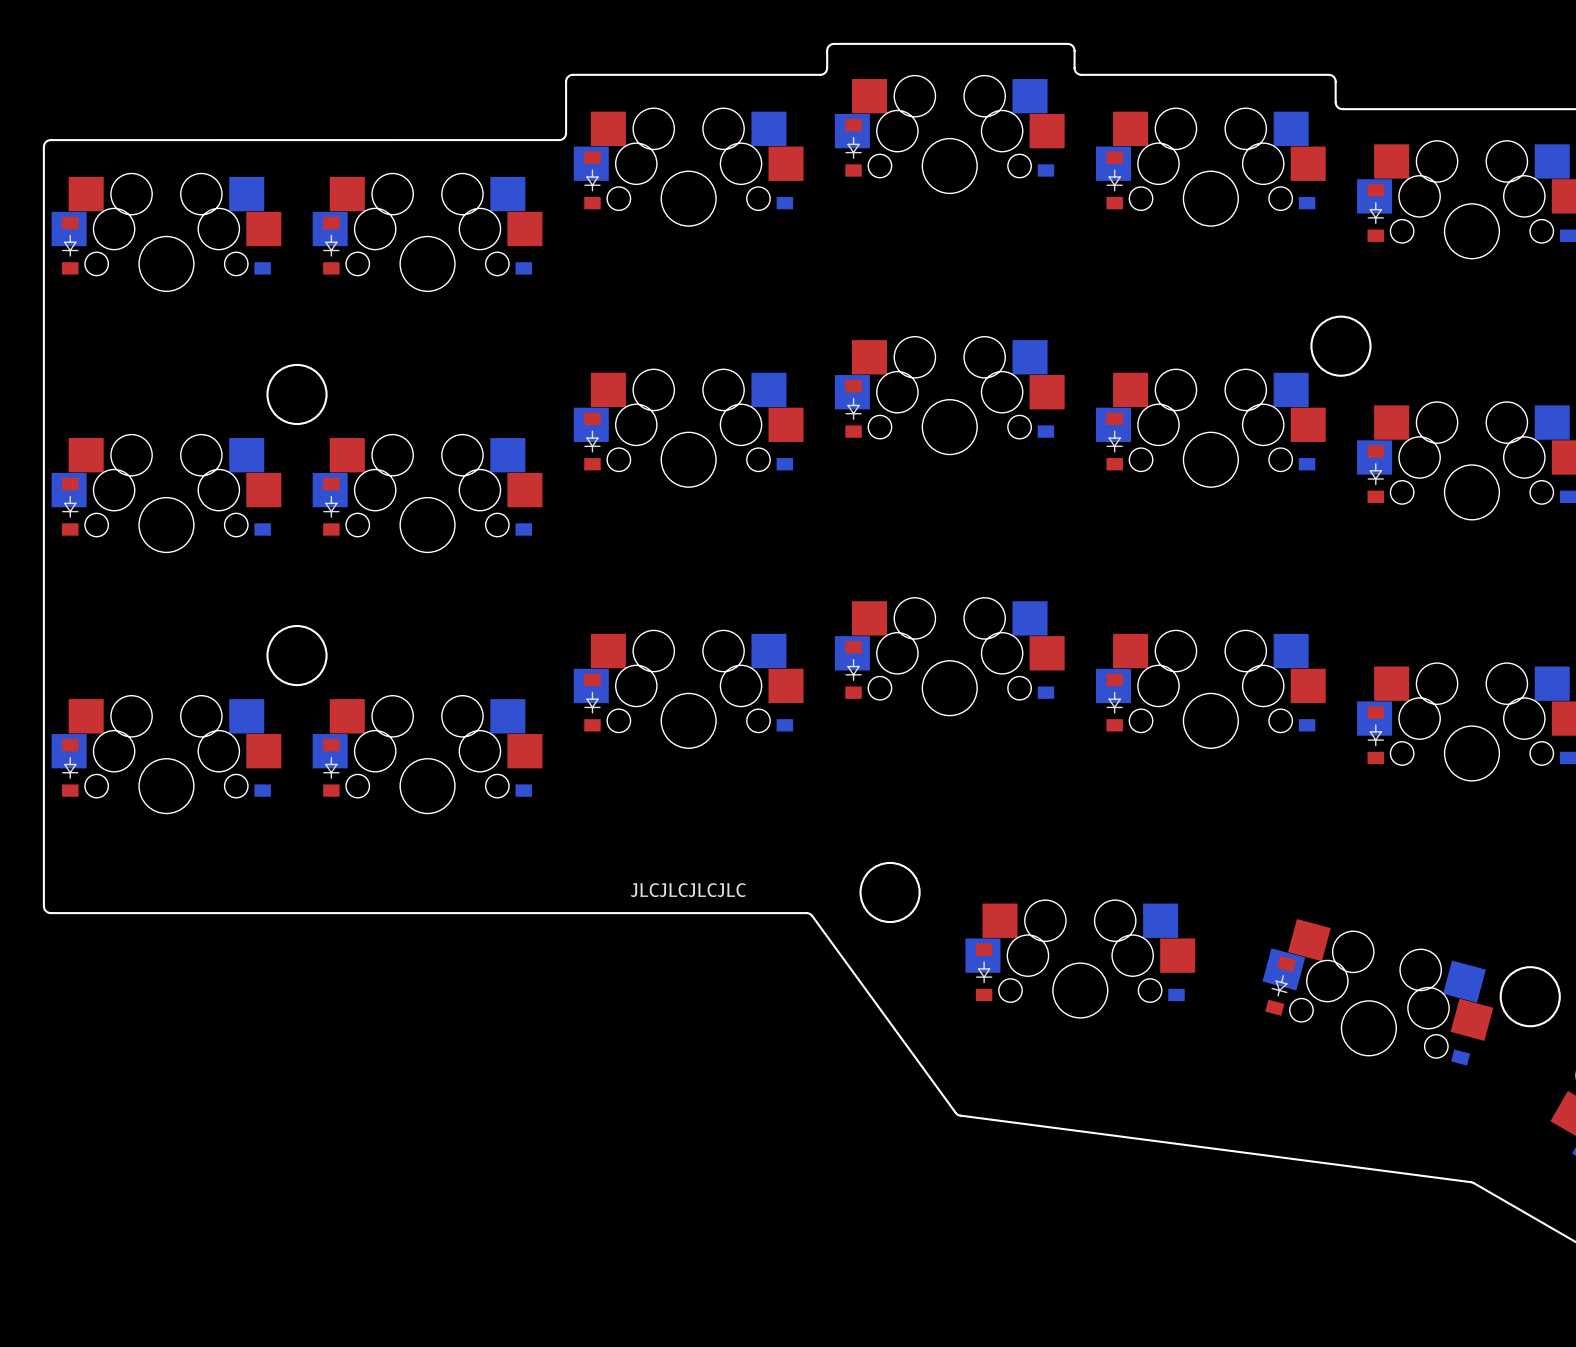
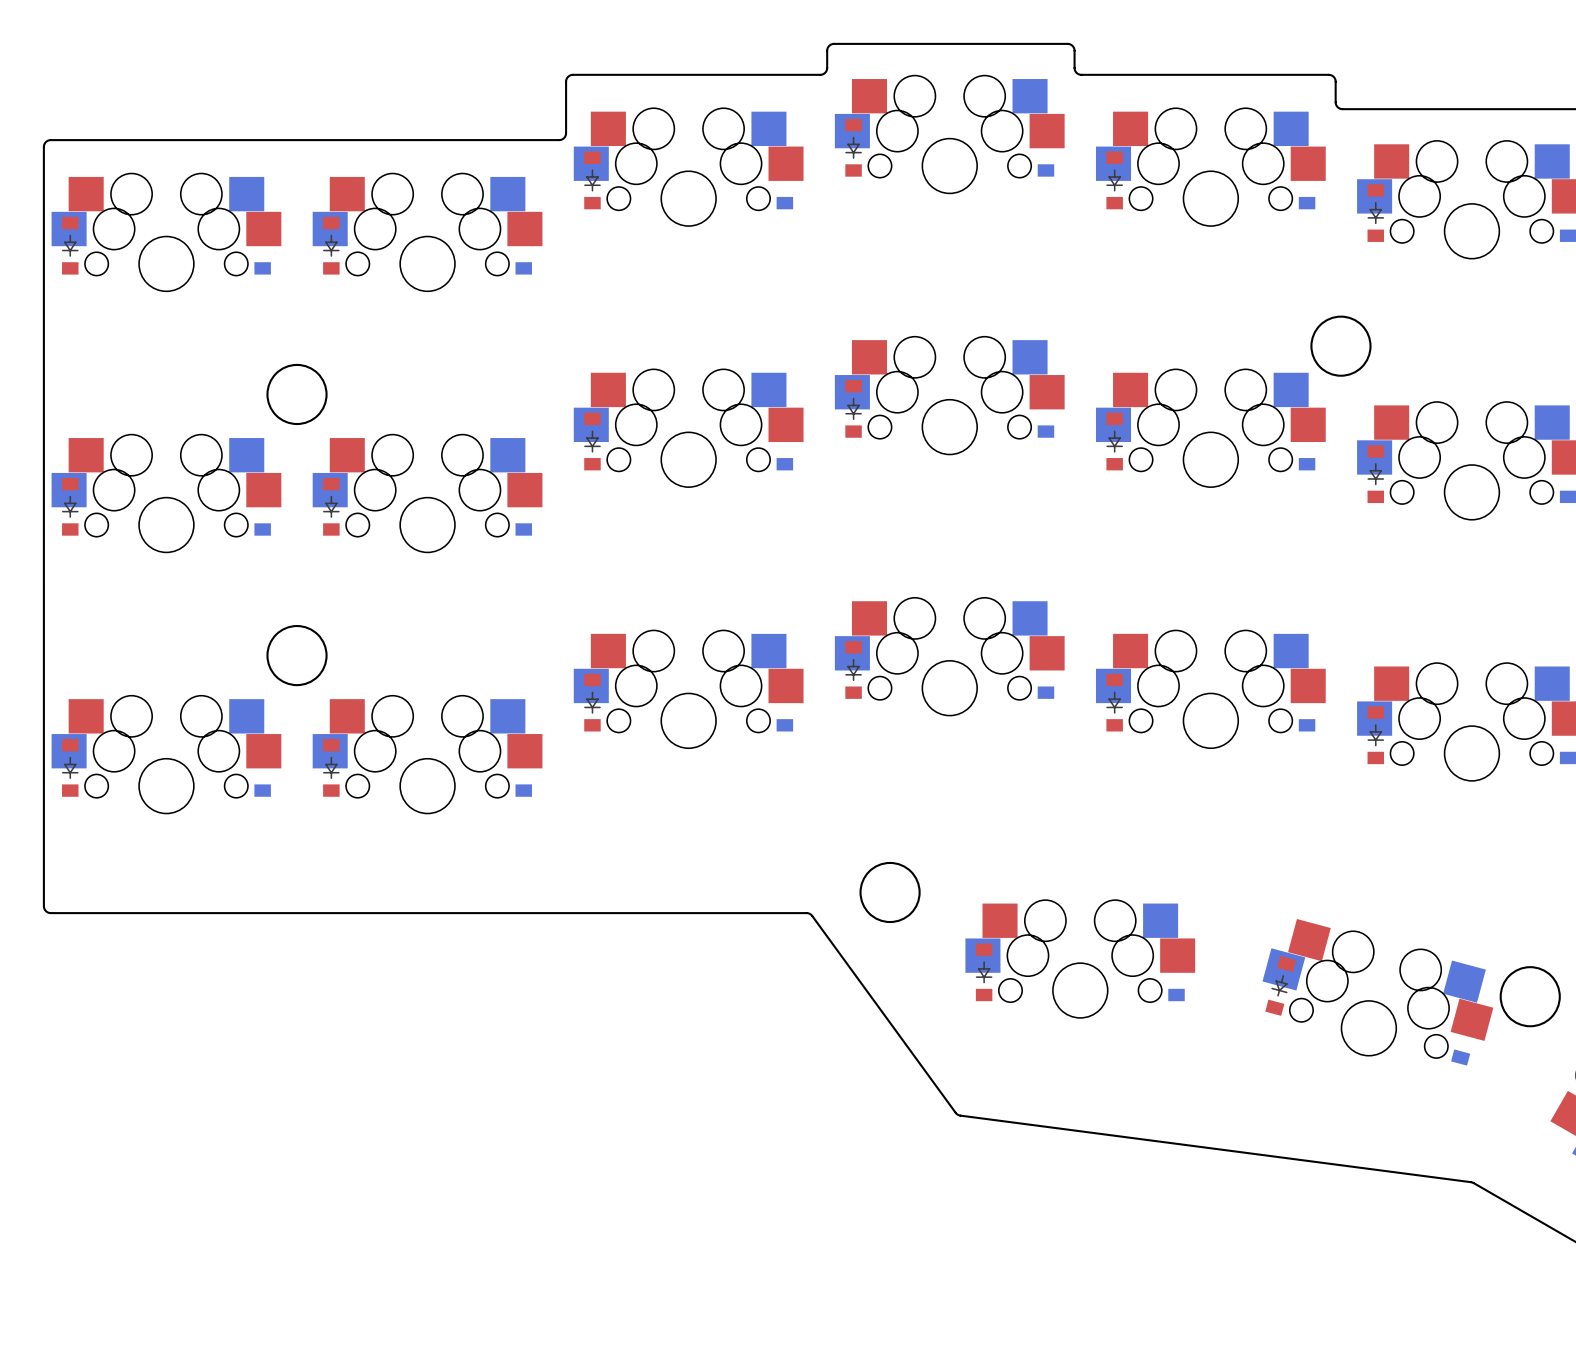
text: JLCJLCJLCJLC (688, 890) -> none

